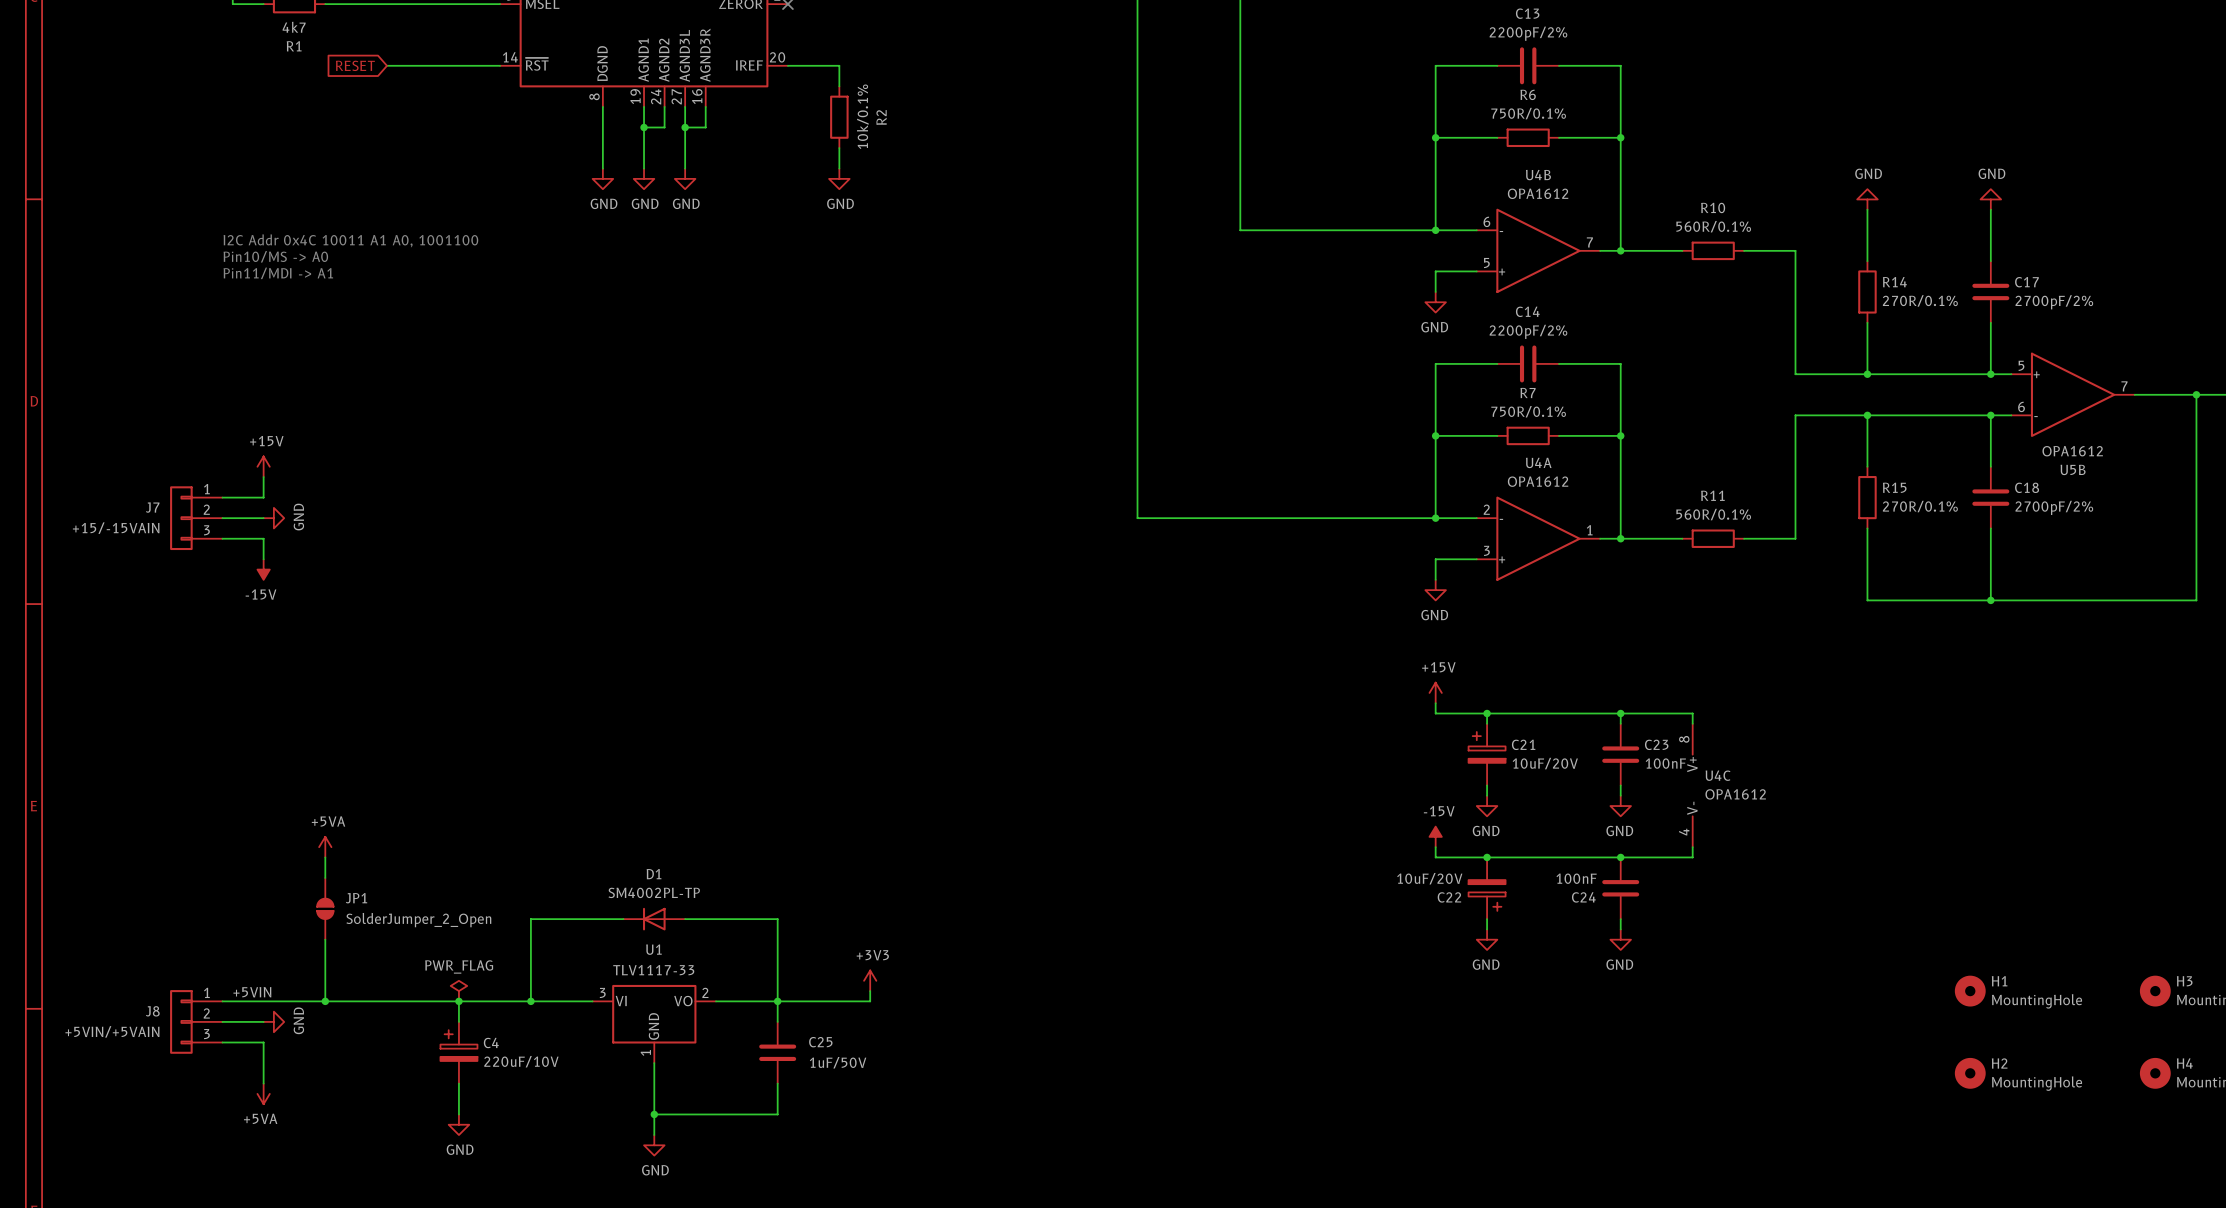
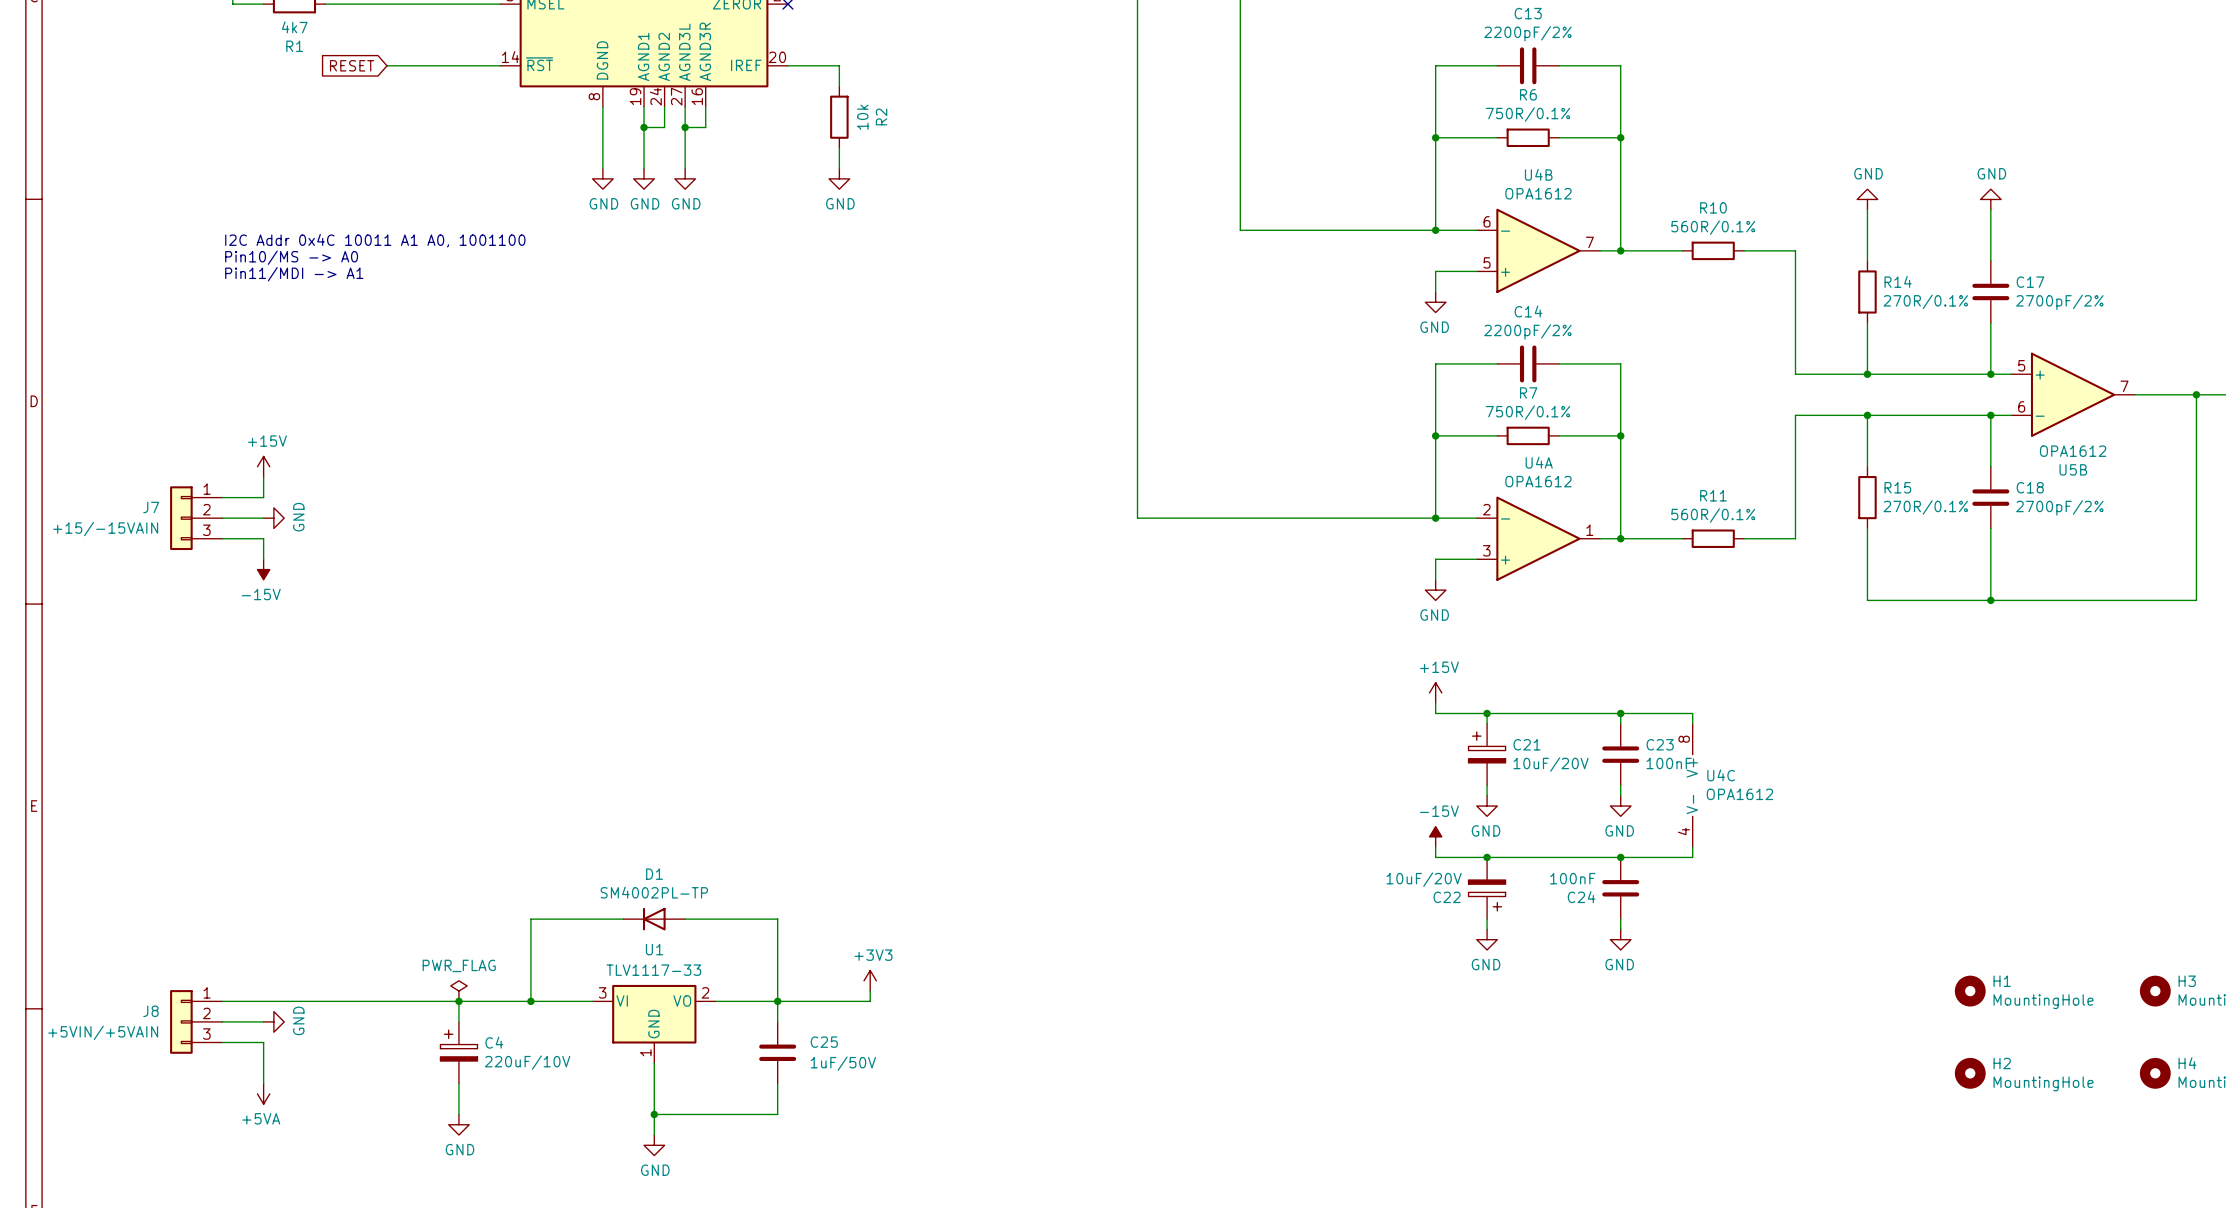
R2 value: 10k/0.1% (862, 116) -> 10k (862, 117)
power symbol: +5VA (325, 847) -> none
wire: (325, 857) (325, 878) -> none
JP1: SolderJumper_2_Open (325, 908) -> none
wire: (325, 939) (325, 1001) -> none
label: +5VIN (252, 992) -> none
junction: (325, 1001) -> none

